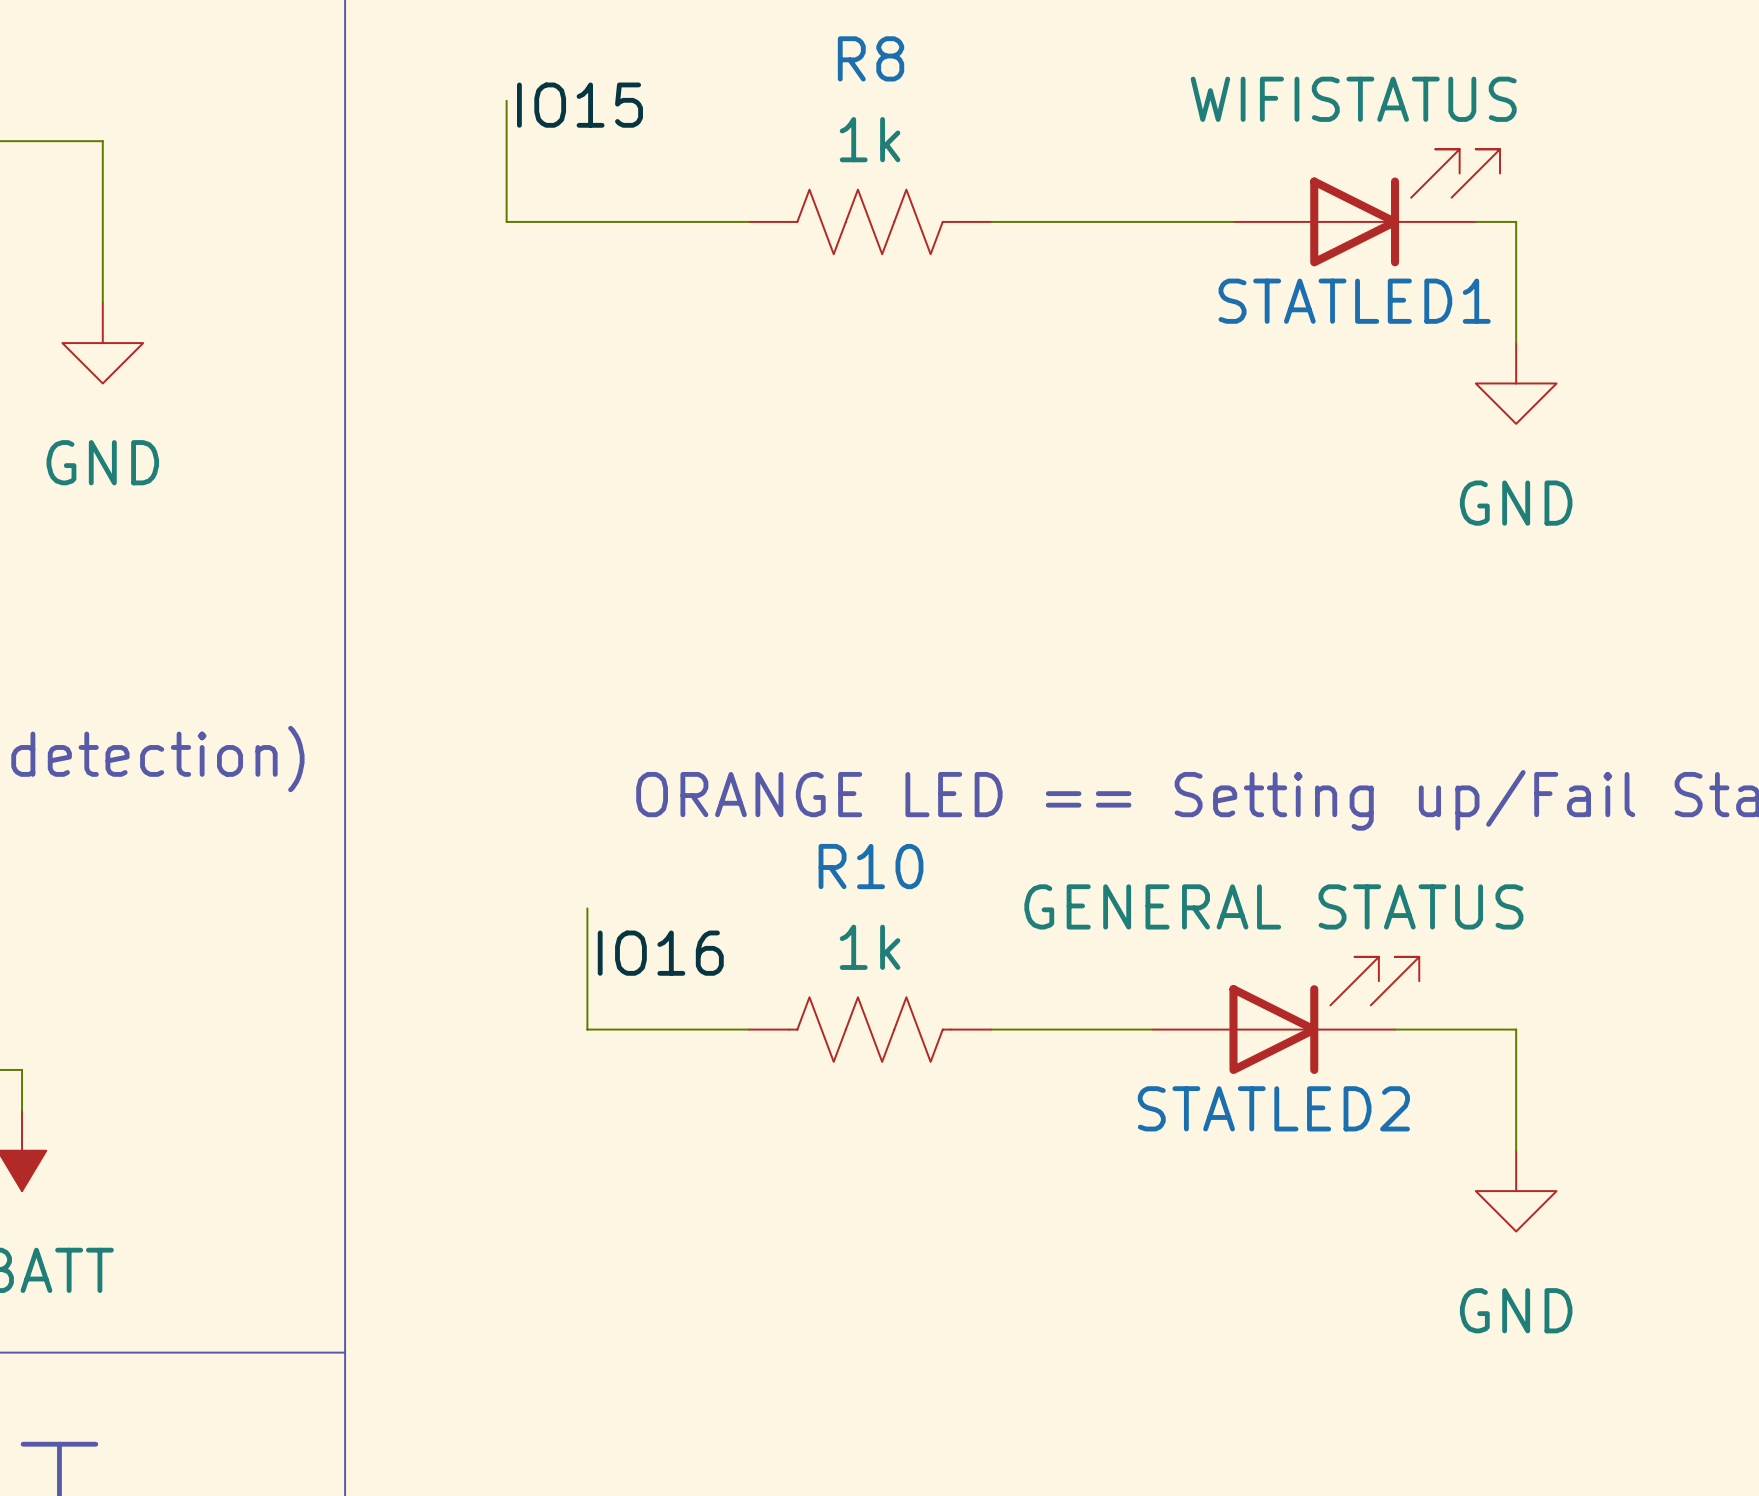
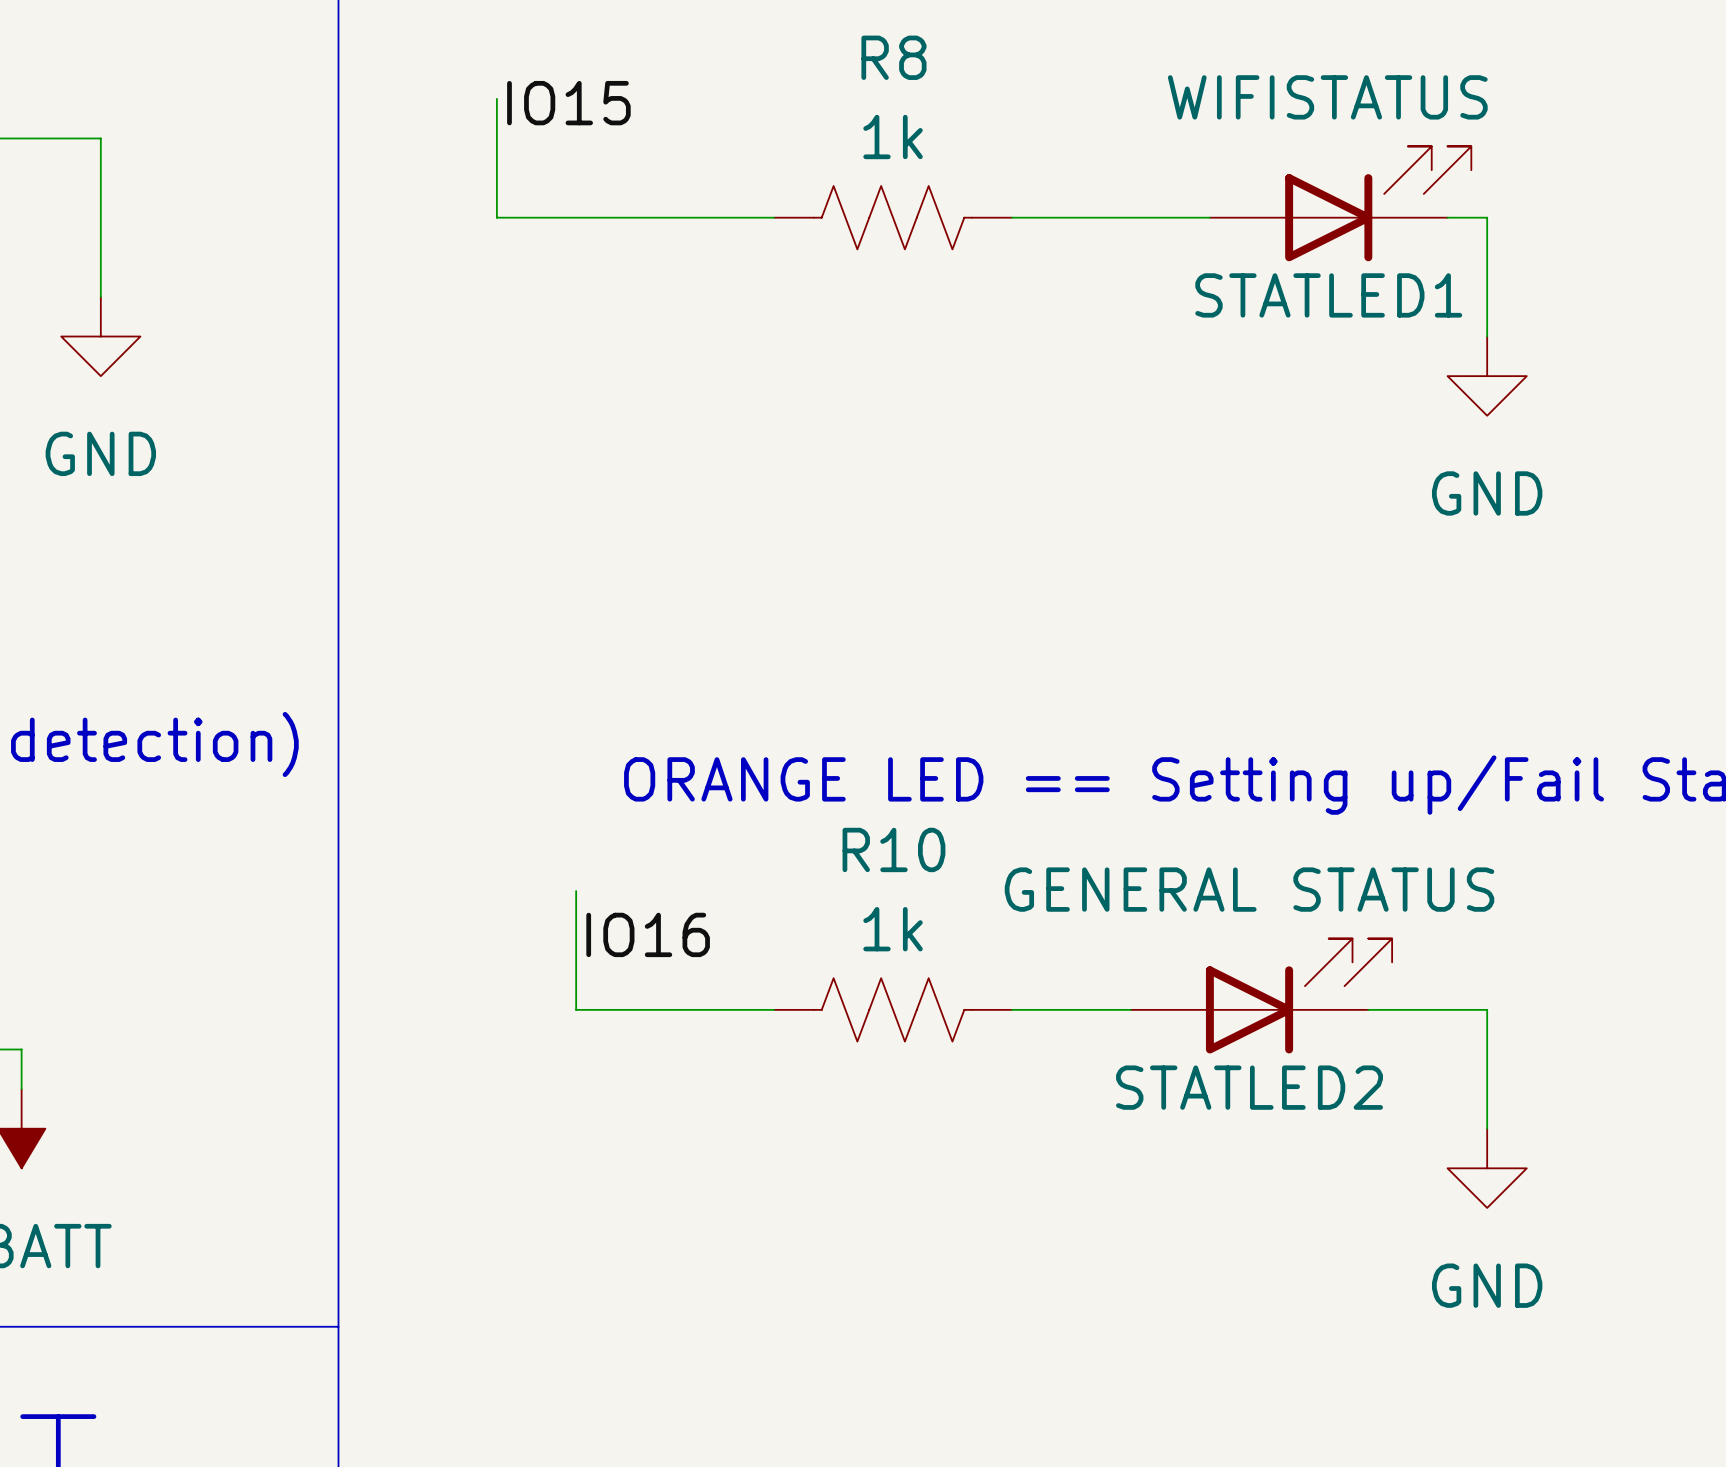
R8 position: (870, 221) -> (893, 217)
R10 position: (870, 1029) -> (893, 1009)

